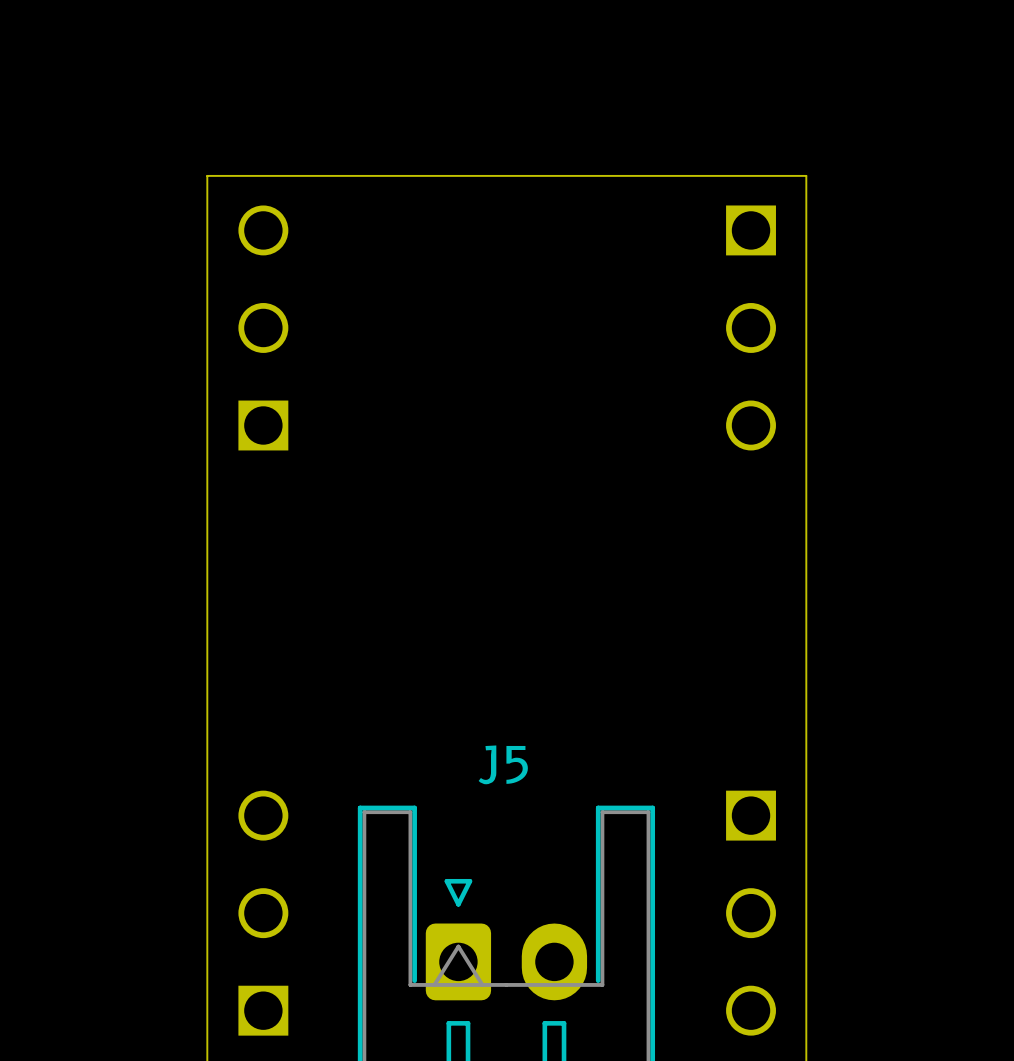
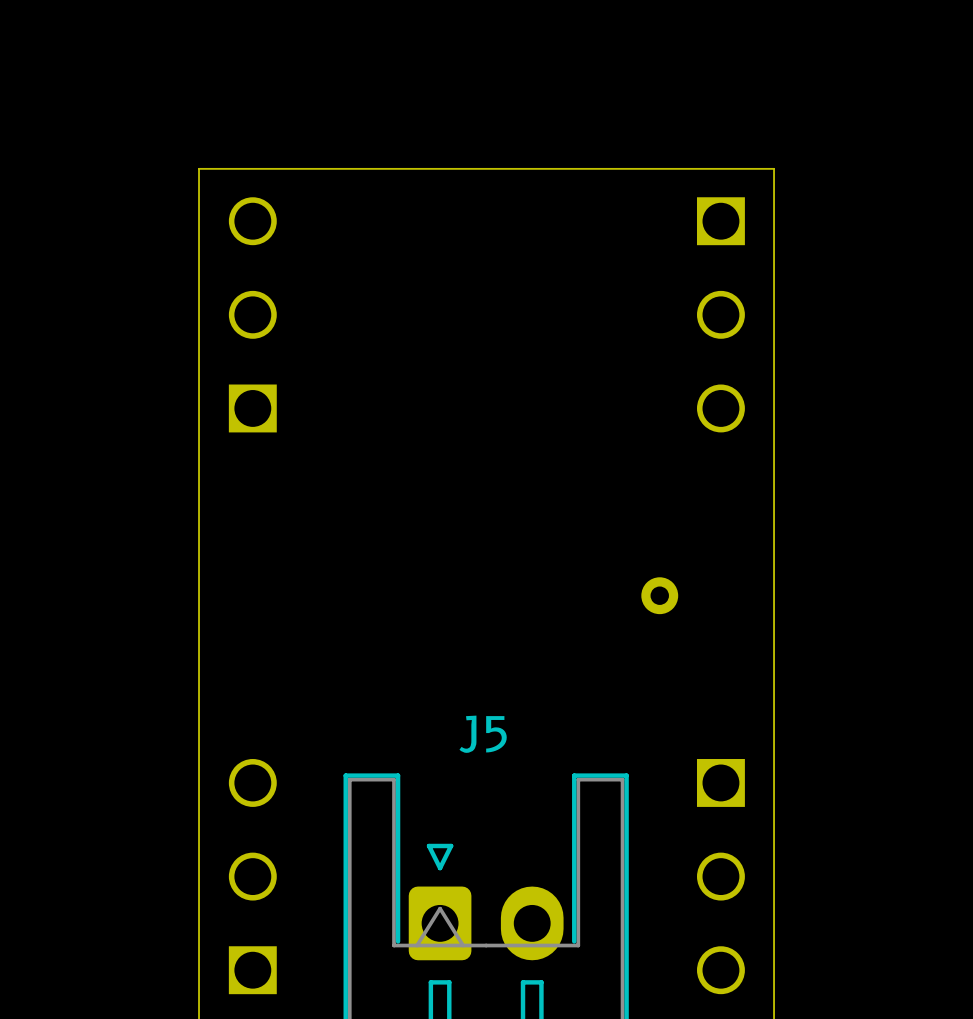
part: none -> (659, 595)

